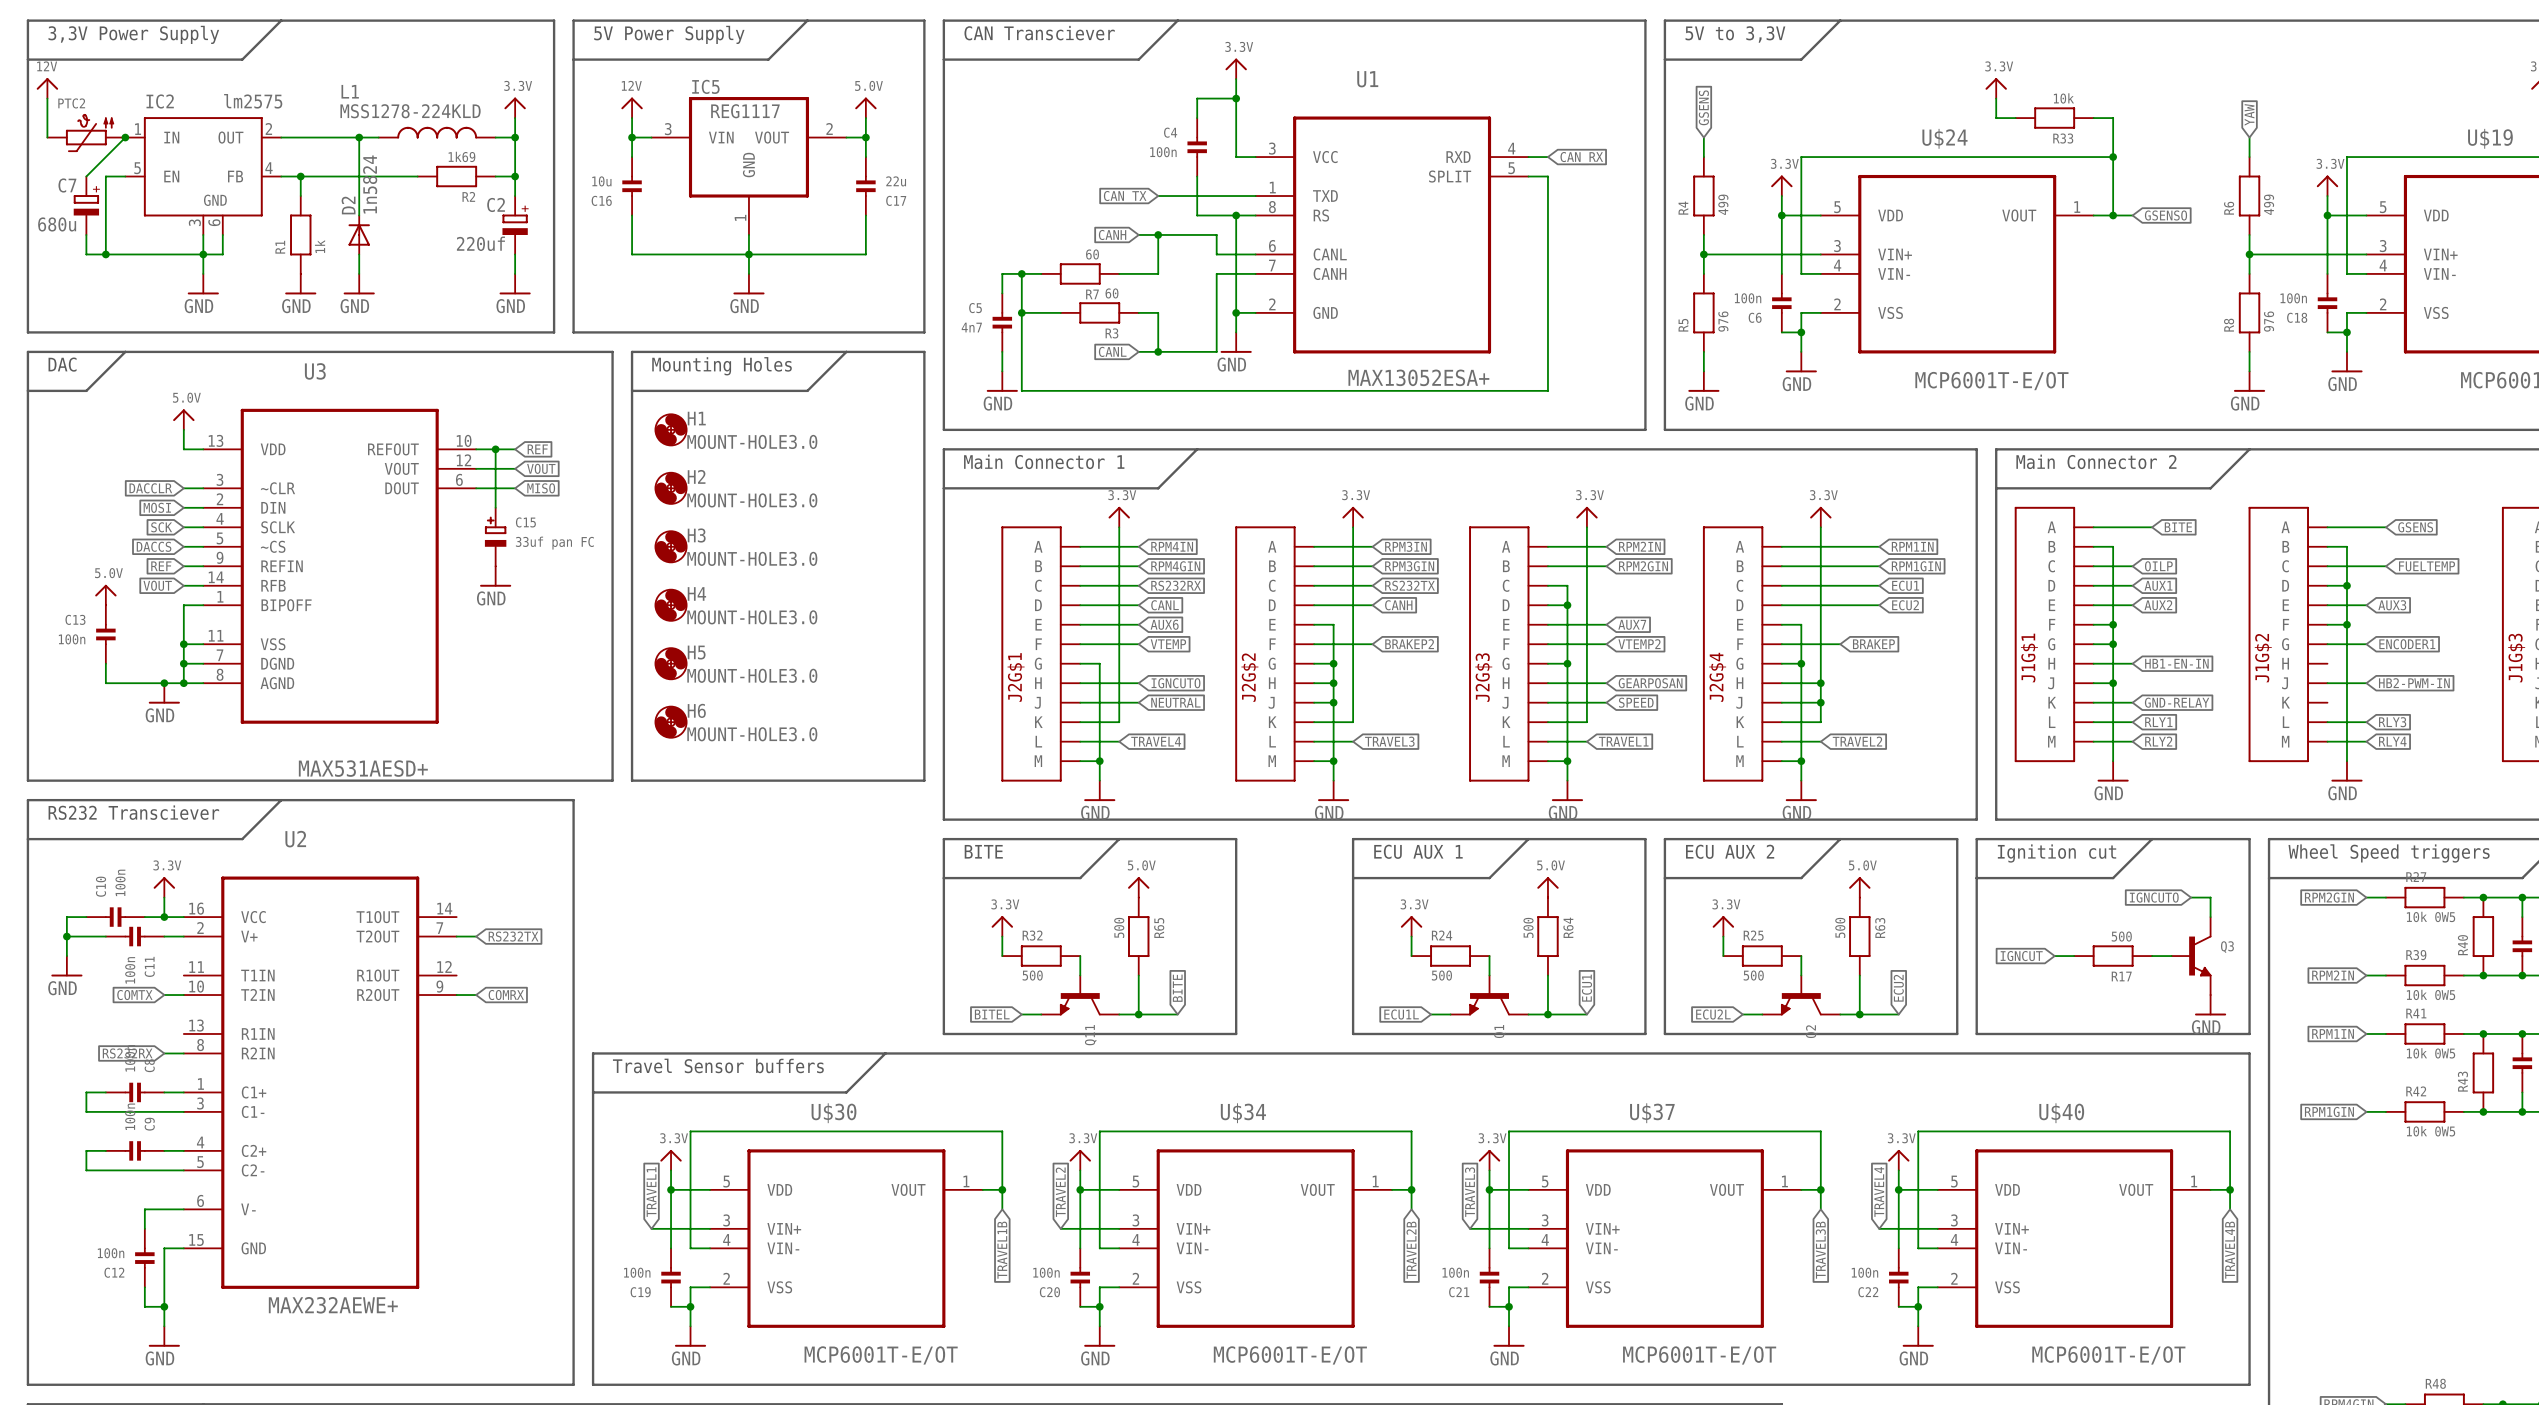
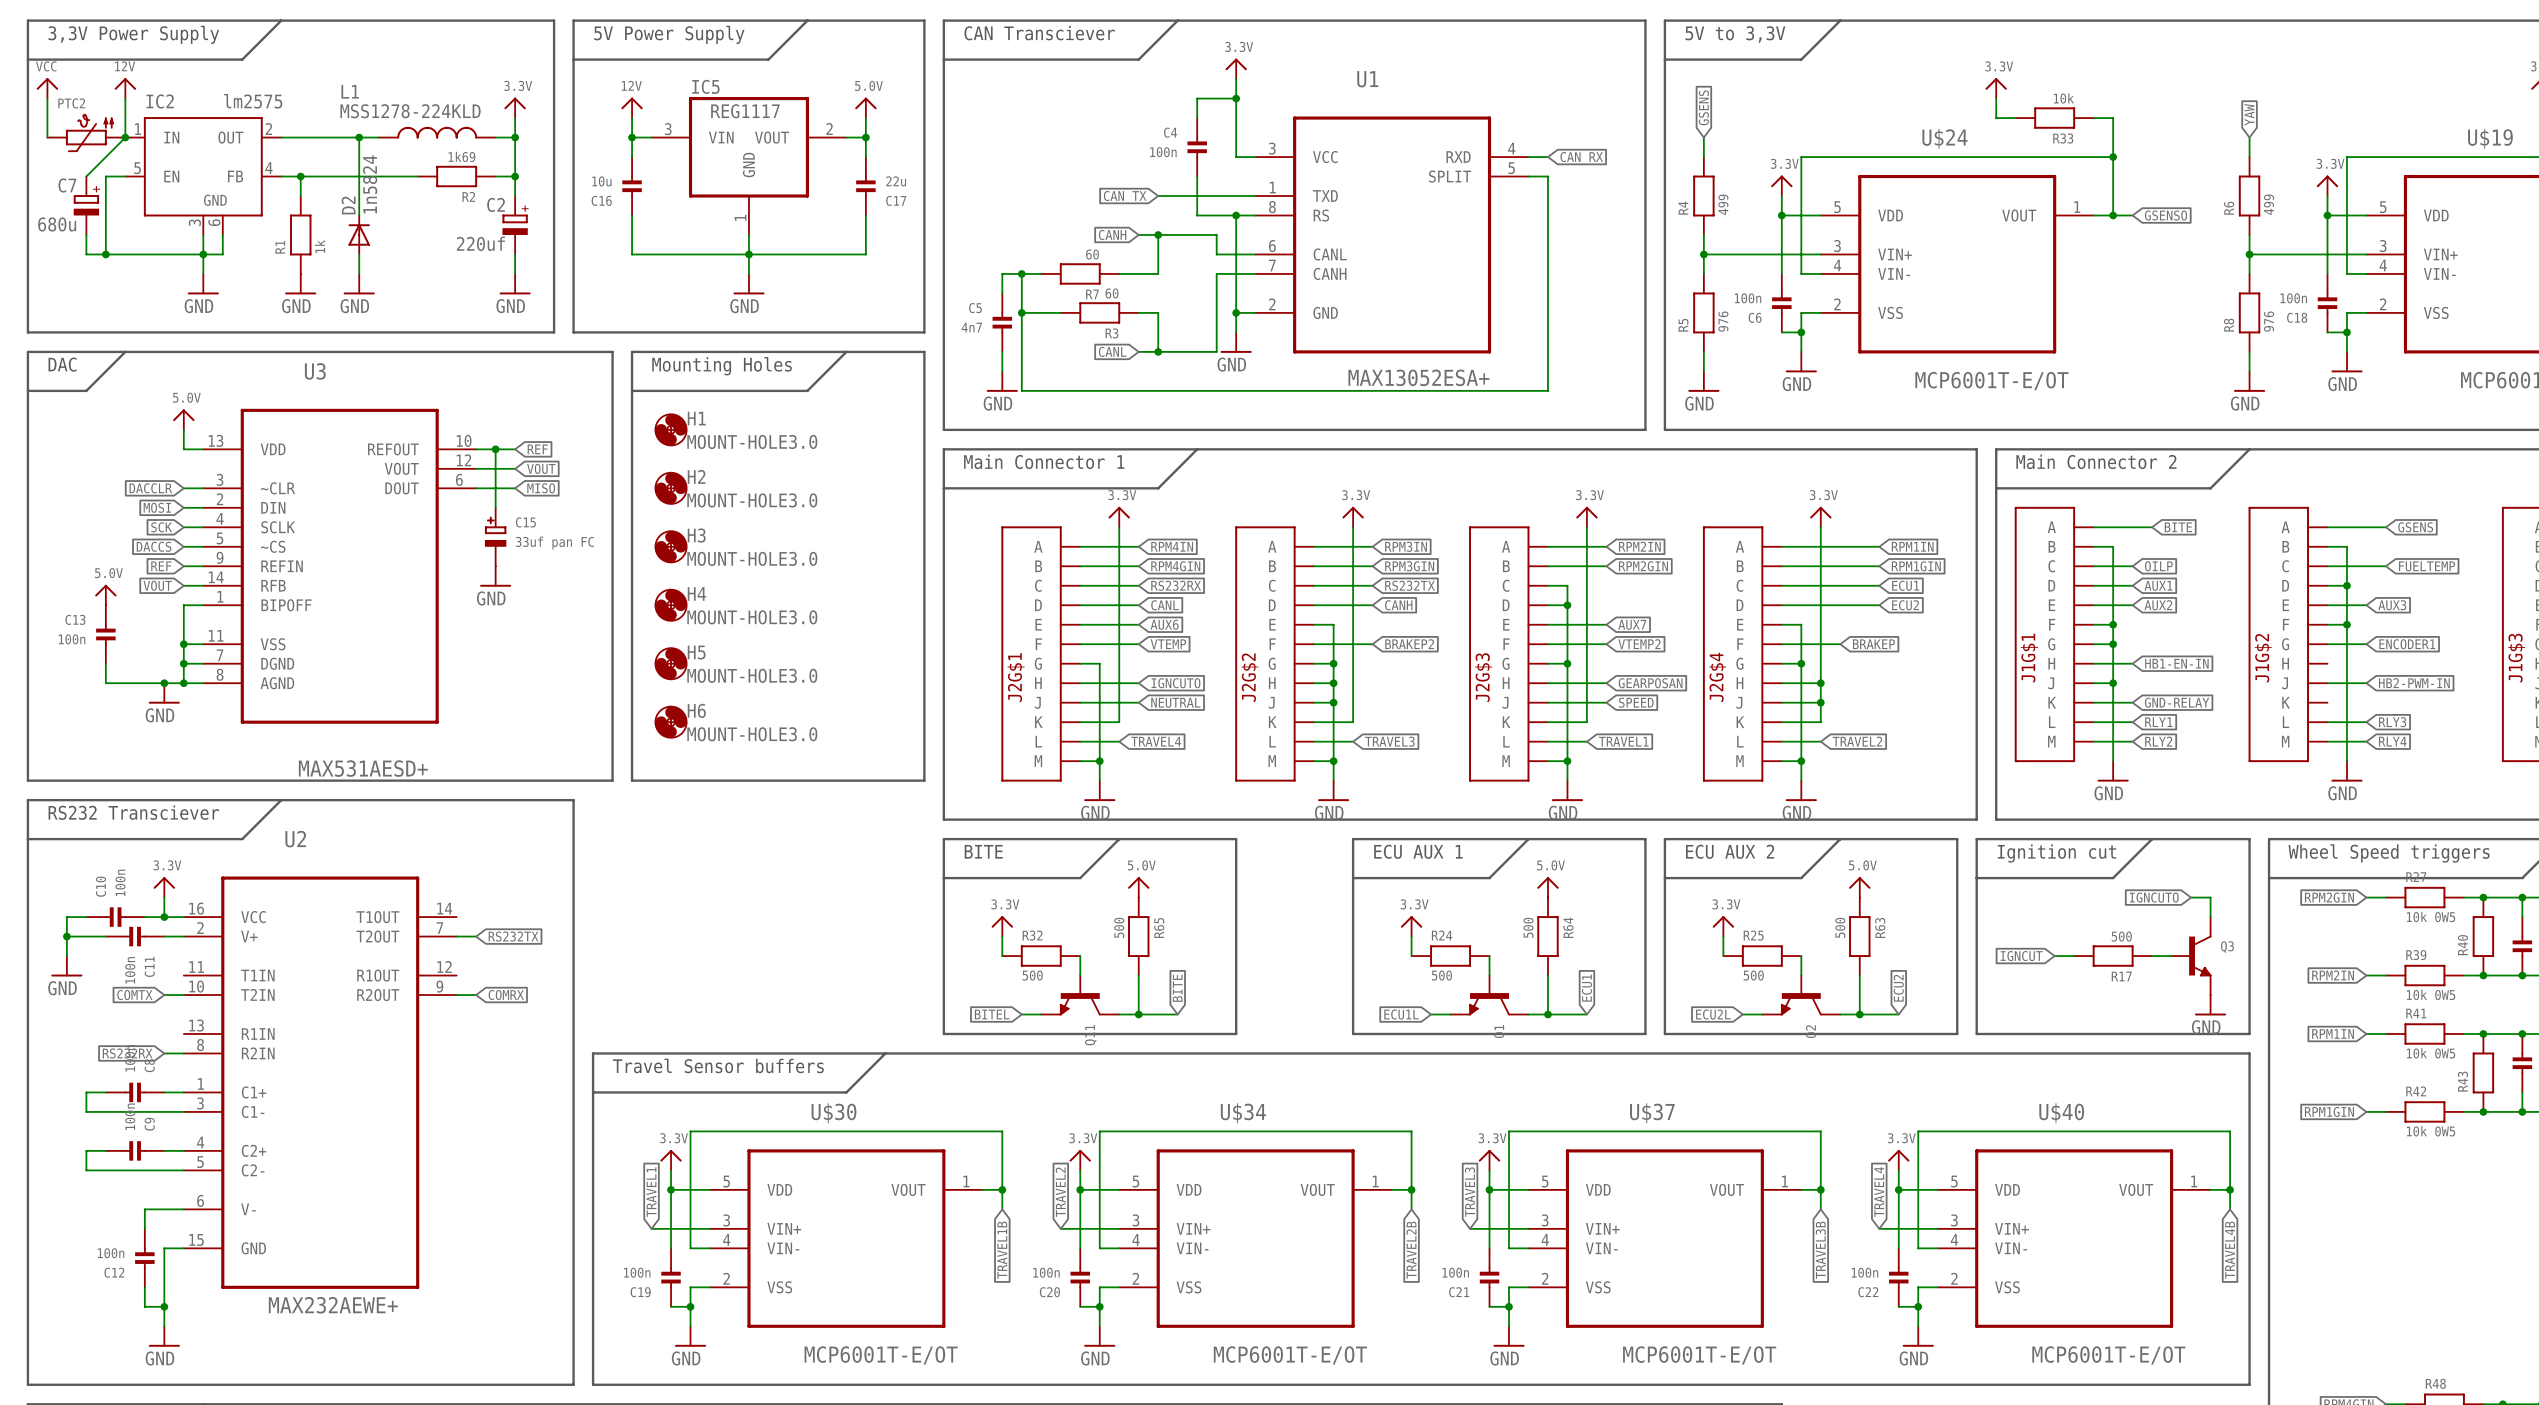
power symbol: 12V (47, 88) -> VCC (47, 88)
power symbol: none -> 12V (125, 88)
wire: none -> (125, 98) (125, 137)

